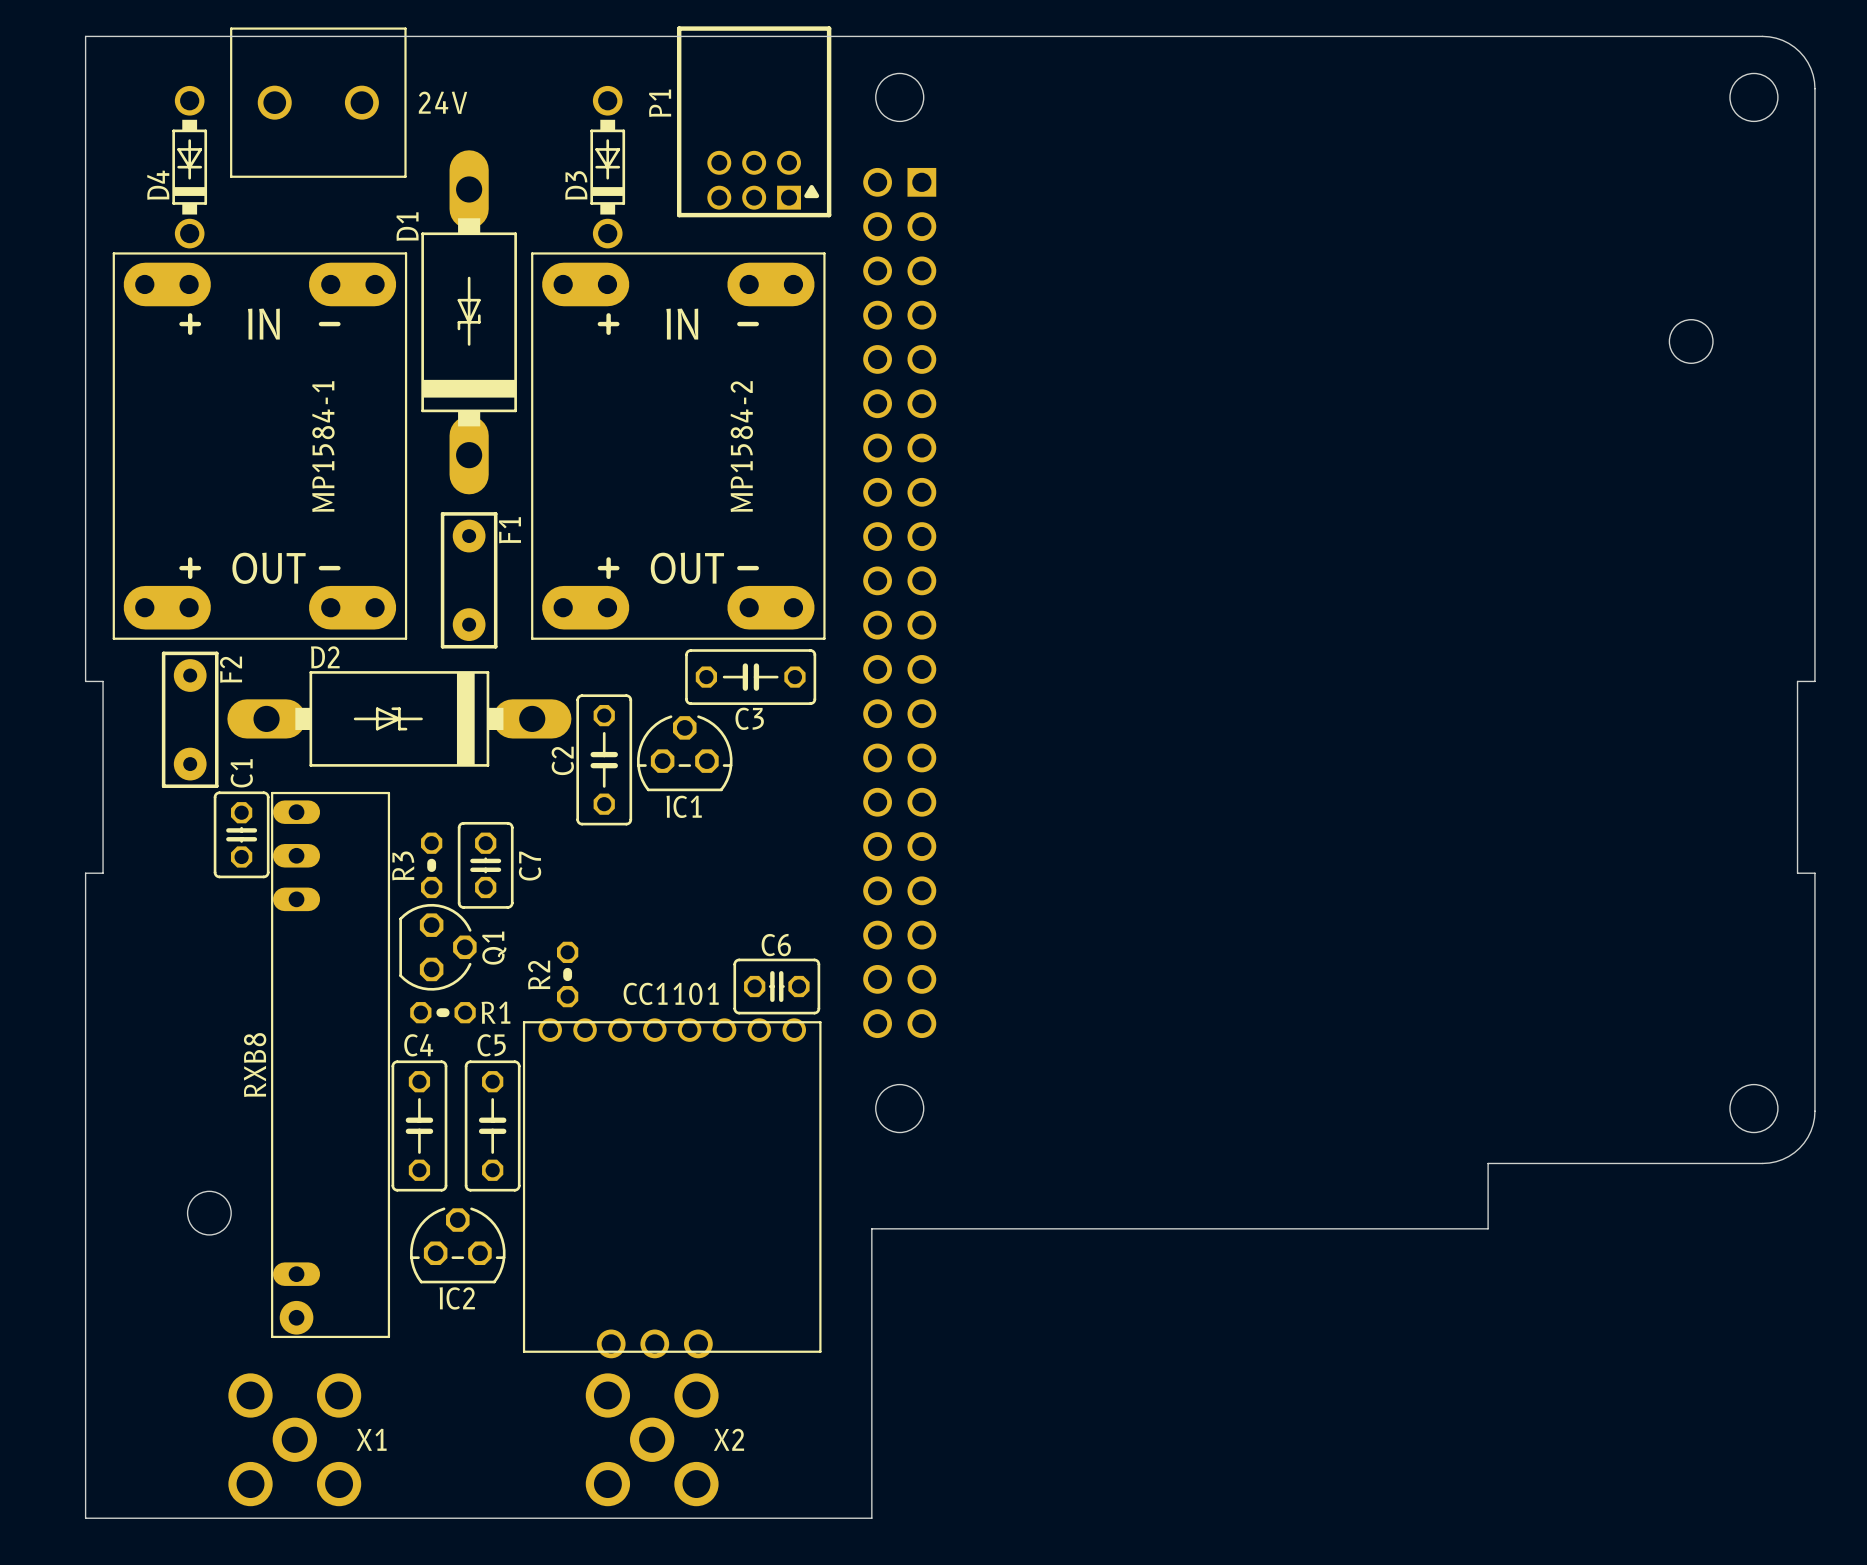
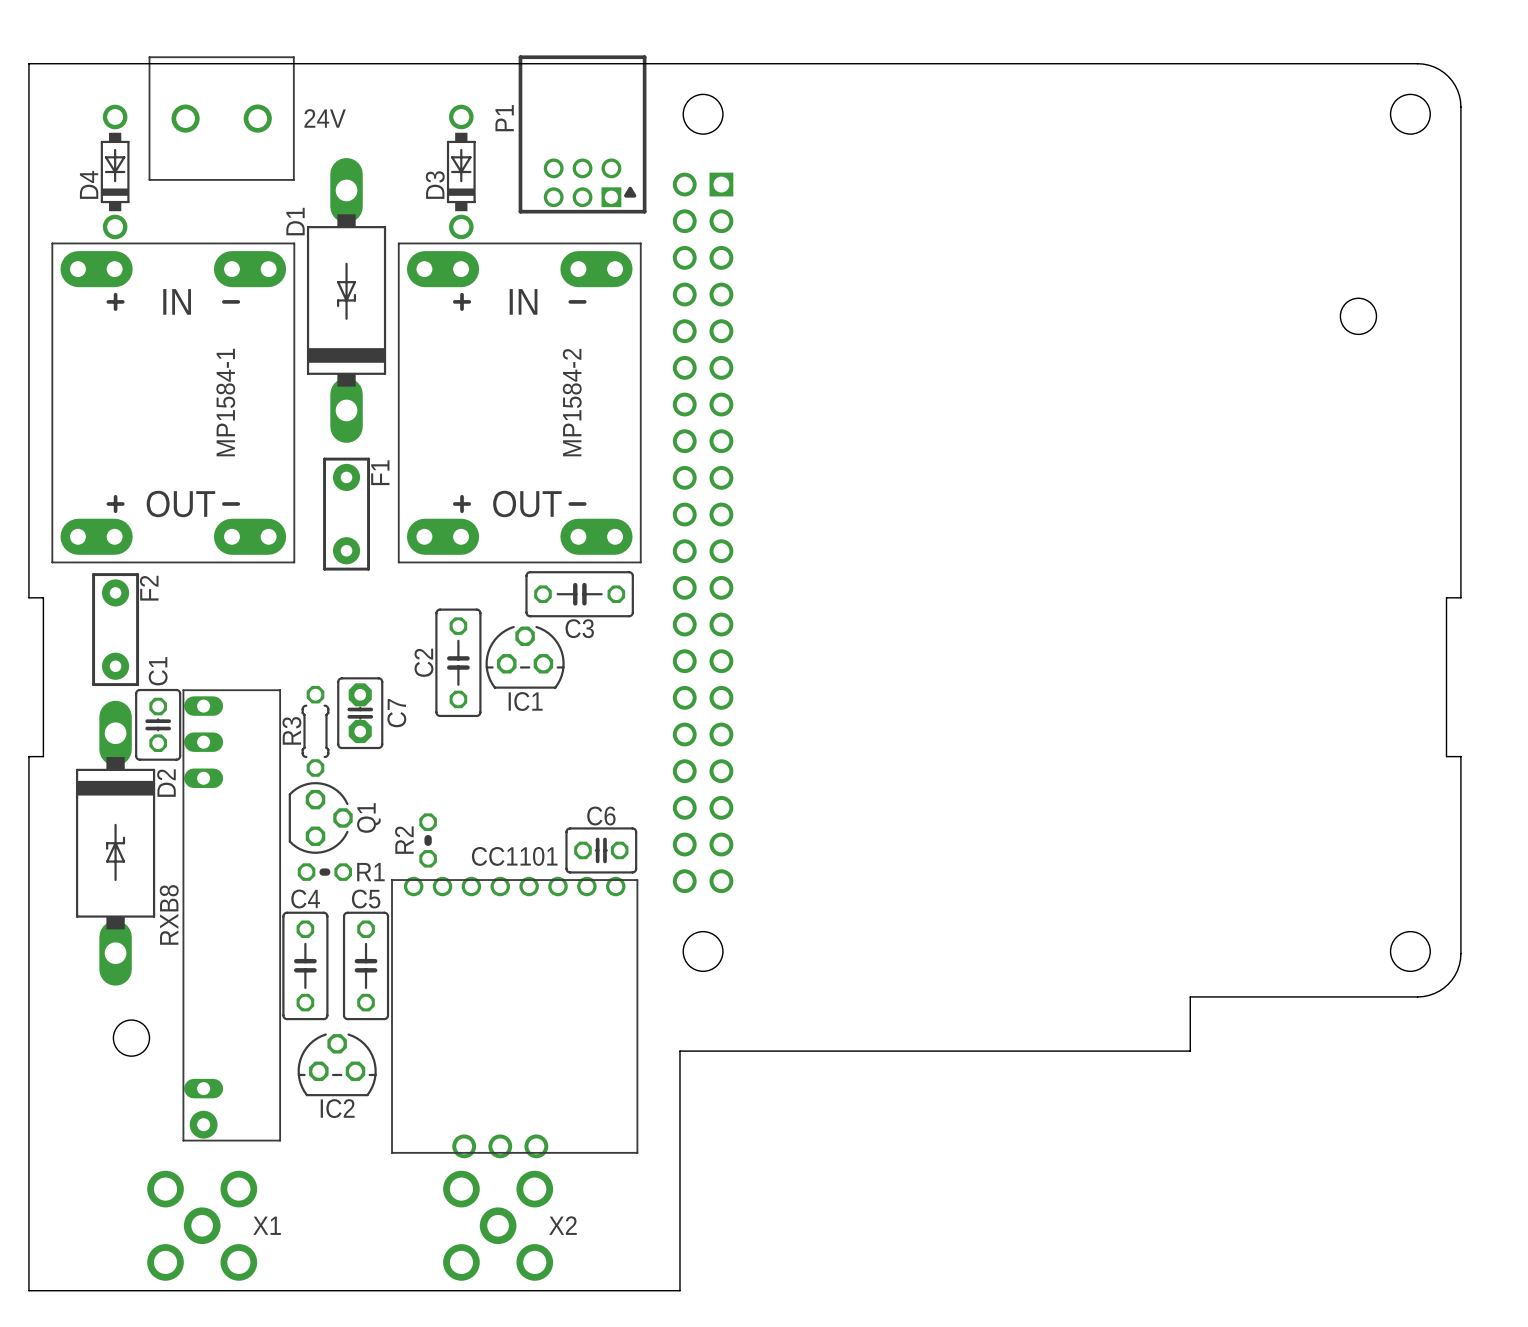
D2 name position: D2 (325, 657) -> D2 (166, 783)
D2 rotation: 0° (399, 718) -> 90° counterclockwise (115, 843)
D2 position: (399, 718) -> (115, 843)
C7 footprint: [457, 821, 514, 909] -> [337, 677, 384, 750]
R3 footprint: [421, 832, 443, 899] -> [301, 685, 330, 777]

